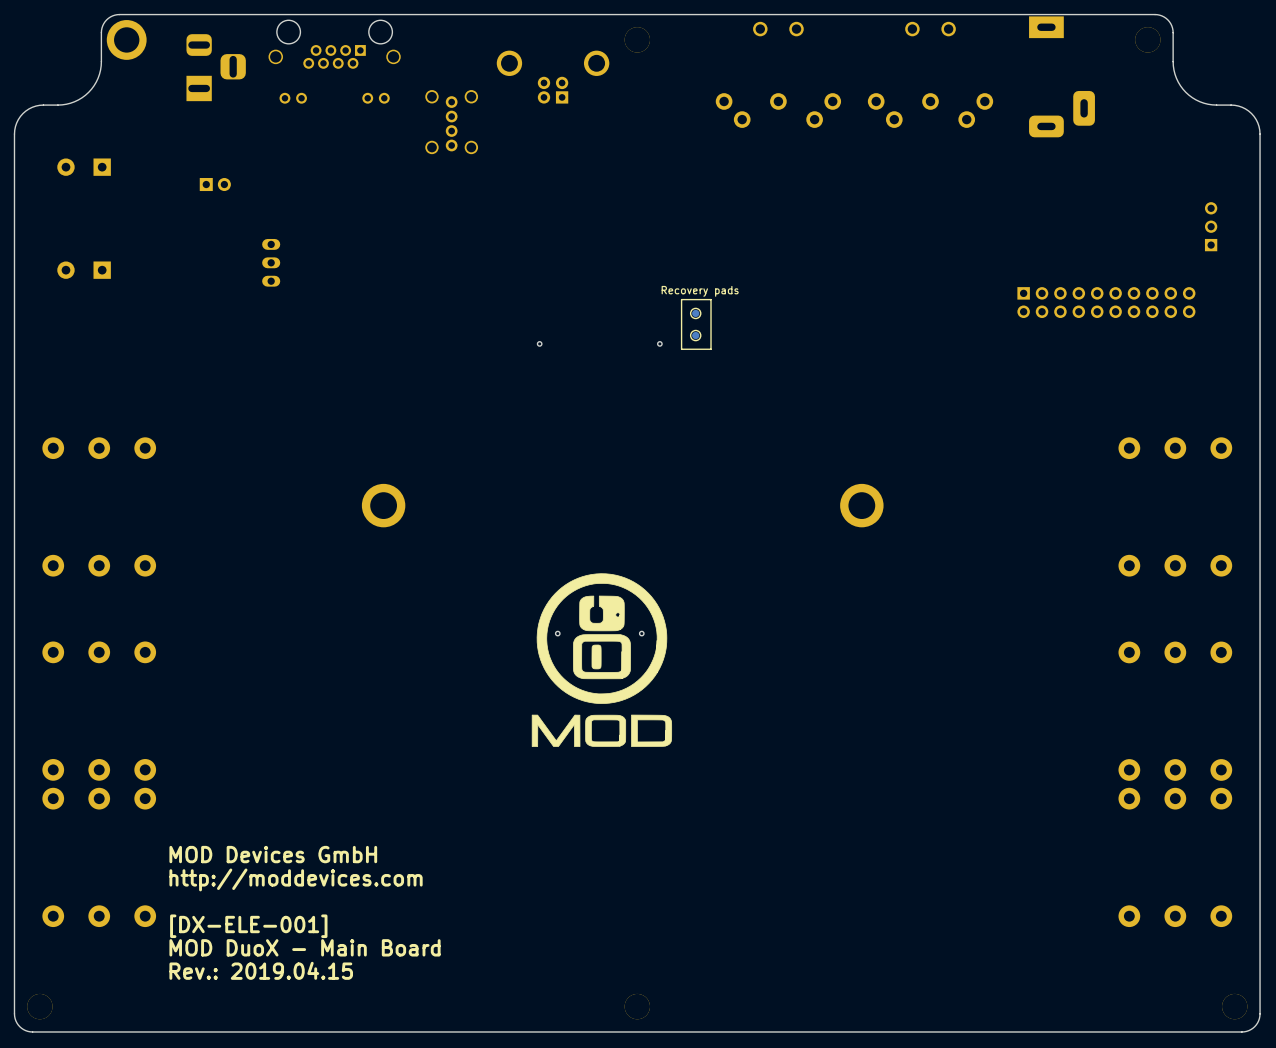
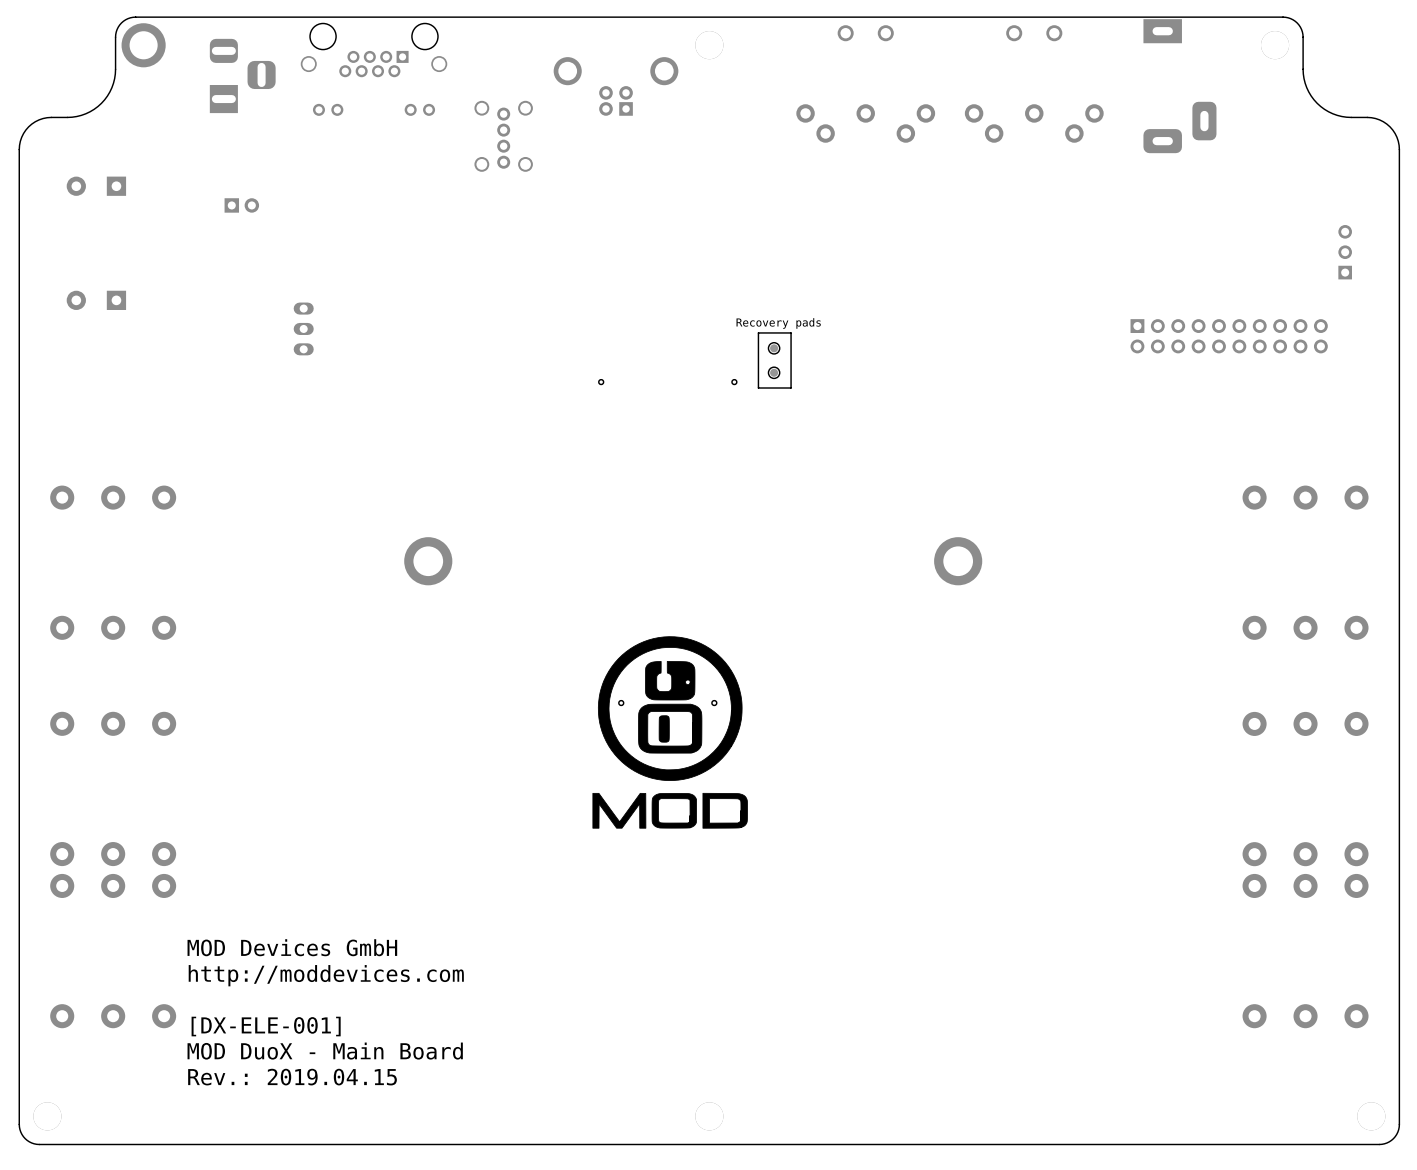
part position: (271, 262) -> (303, 328)

